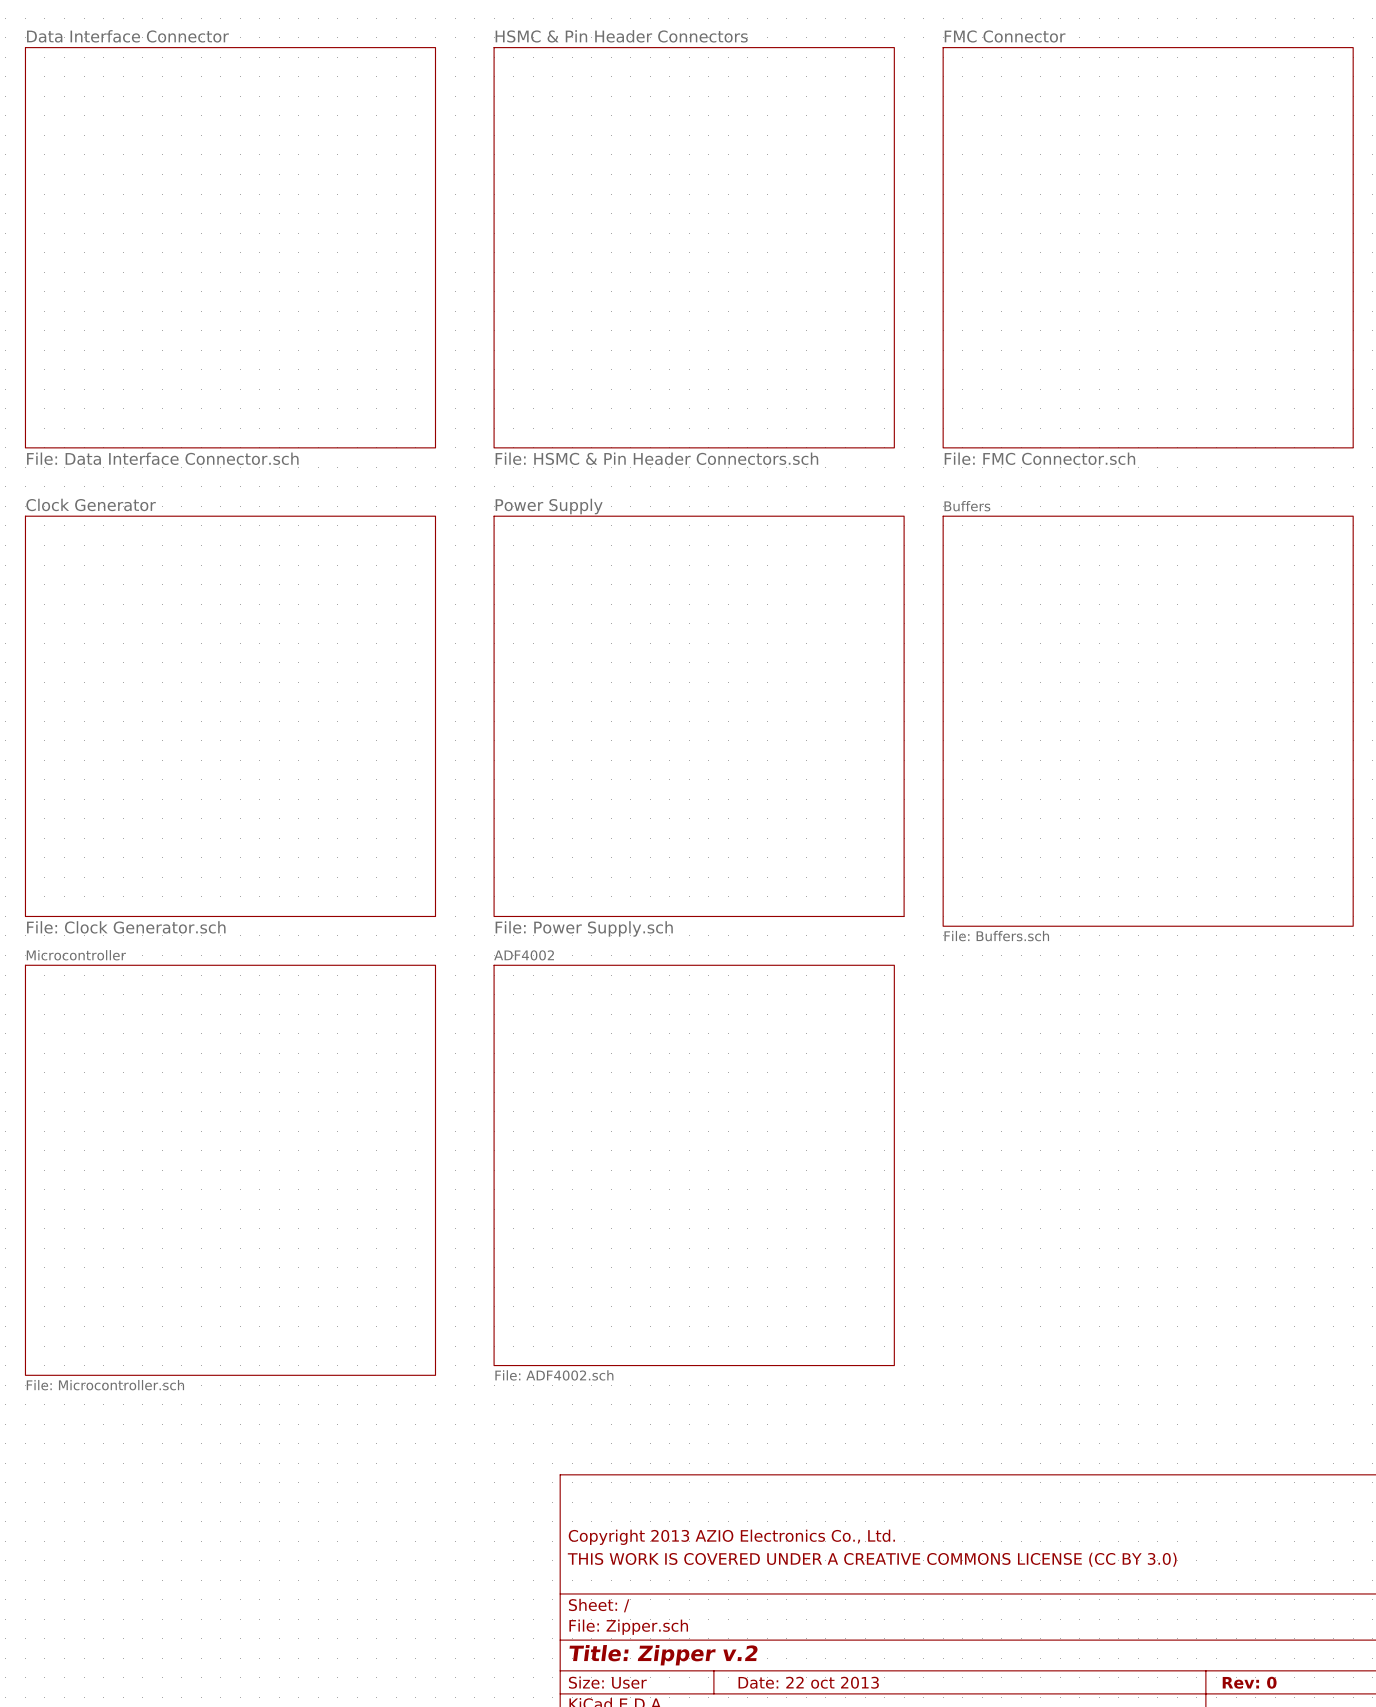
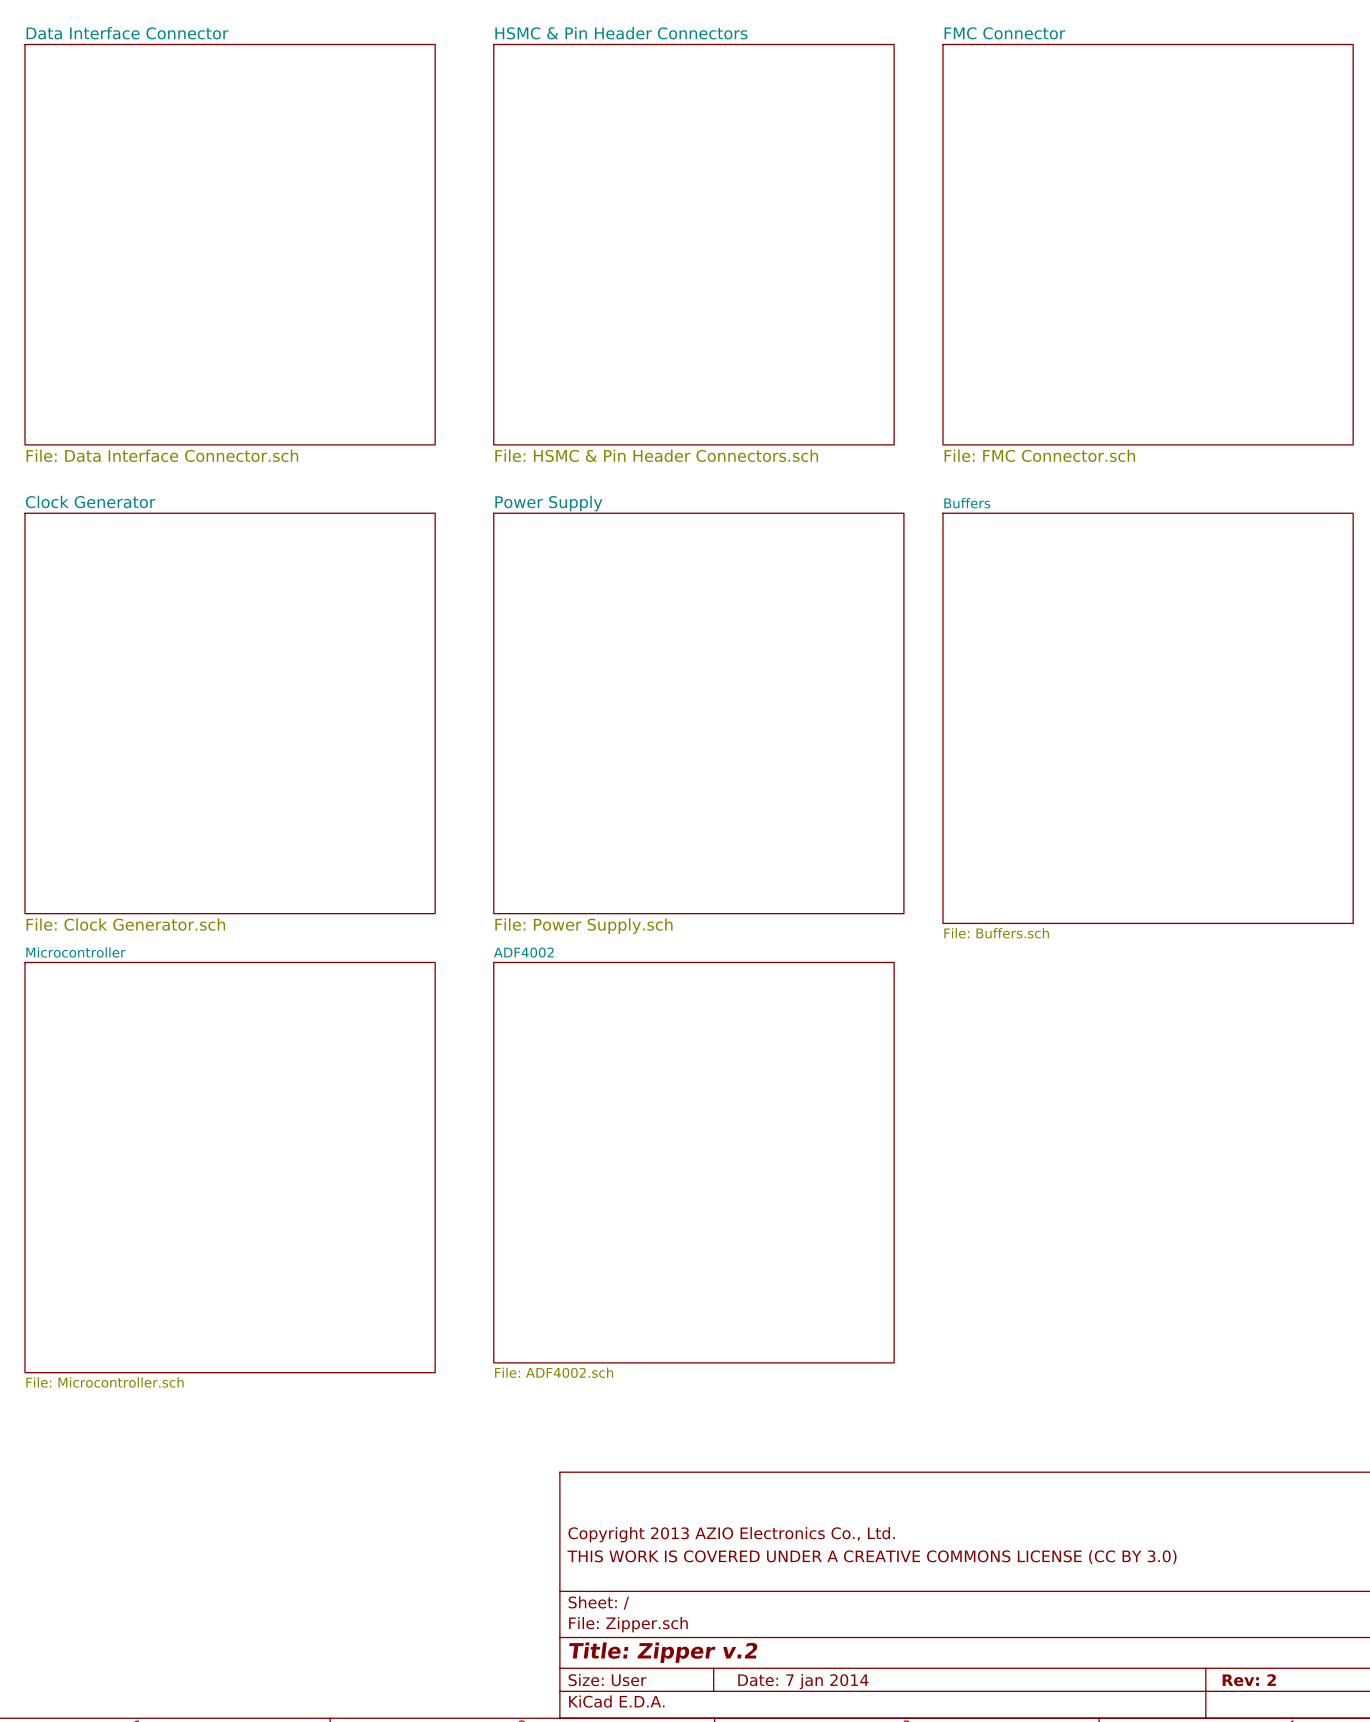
title block: Date: 22 oct 2013 (808, 1682) -> Date: 7 jan 2014 (803, 1681)
title block: Rev: 0 (1249, 1682) -> Rev: 2 (1249, 1680)

